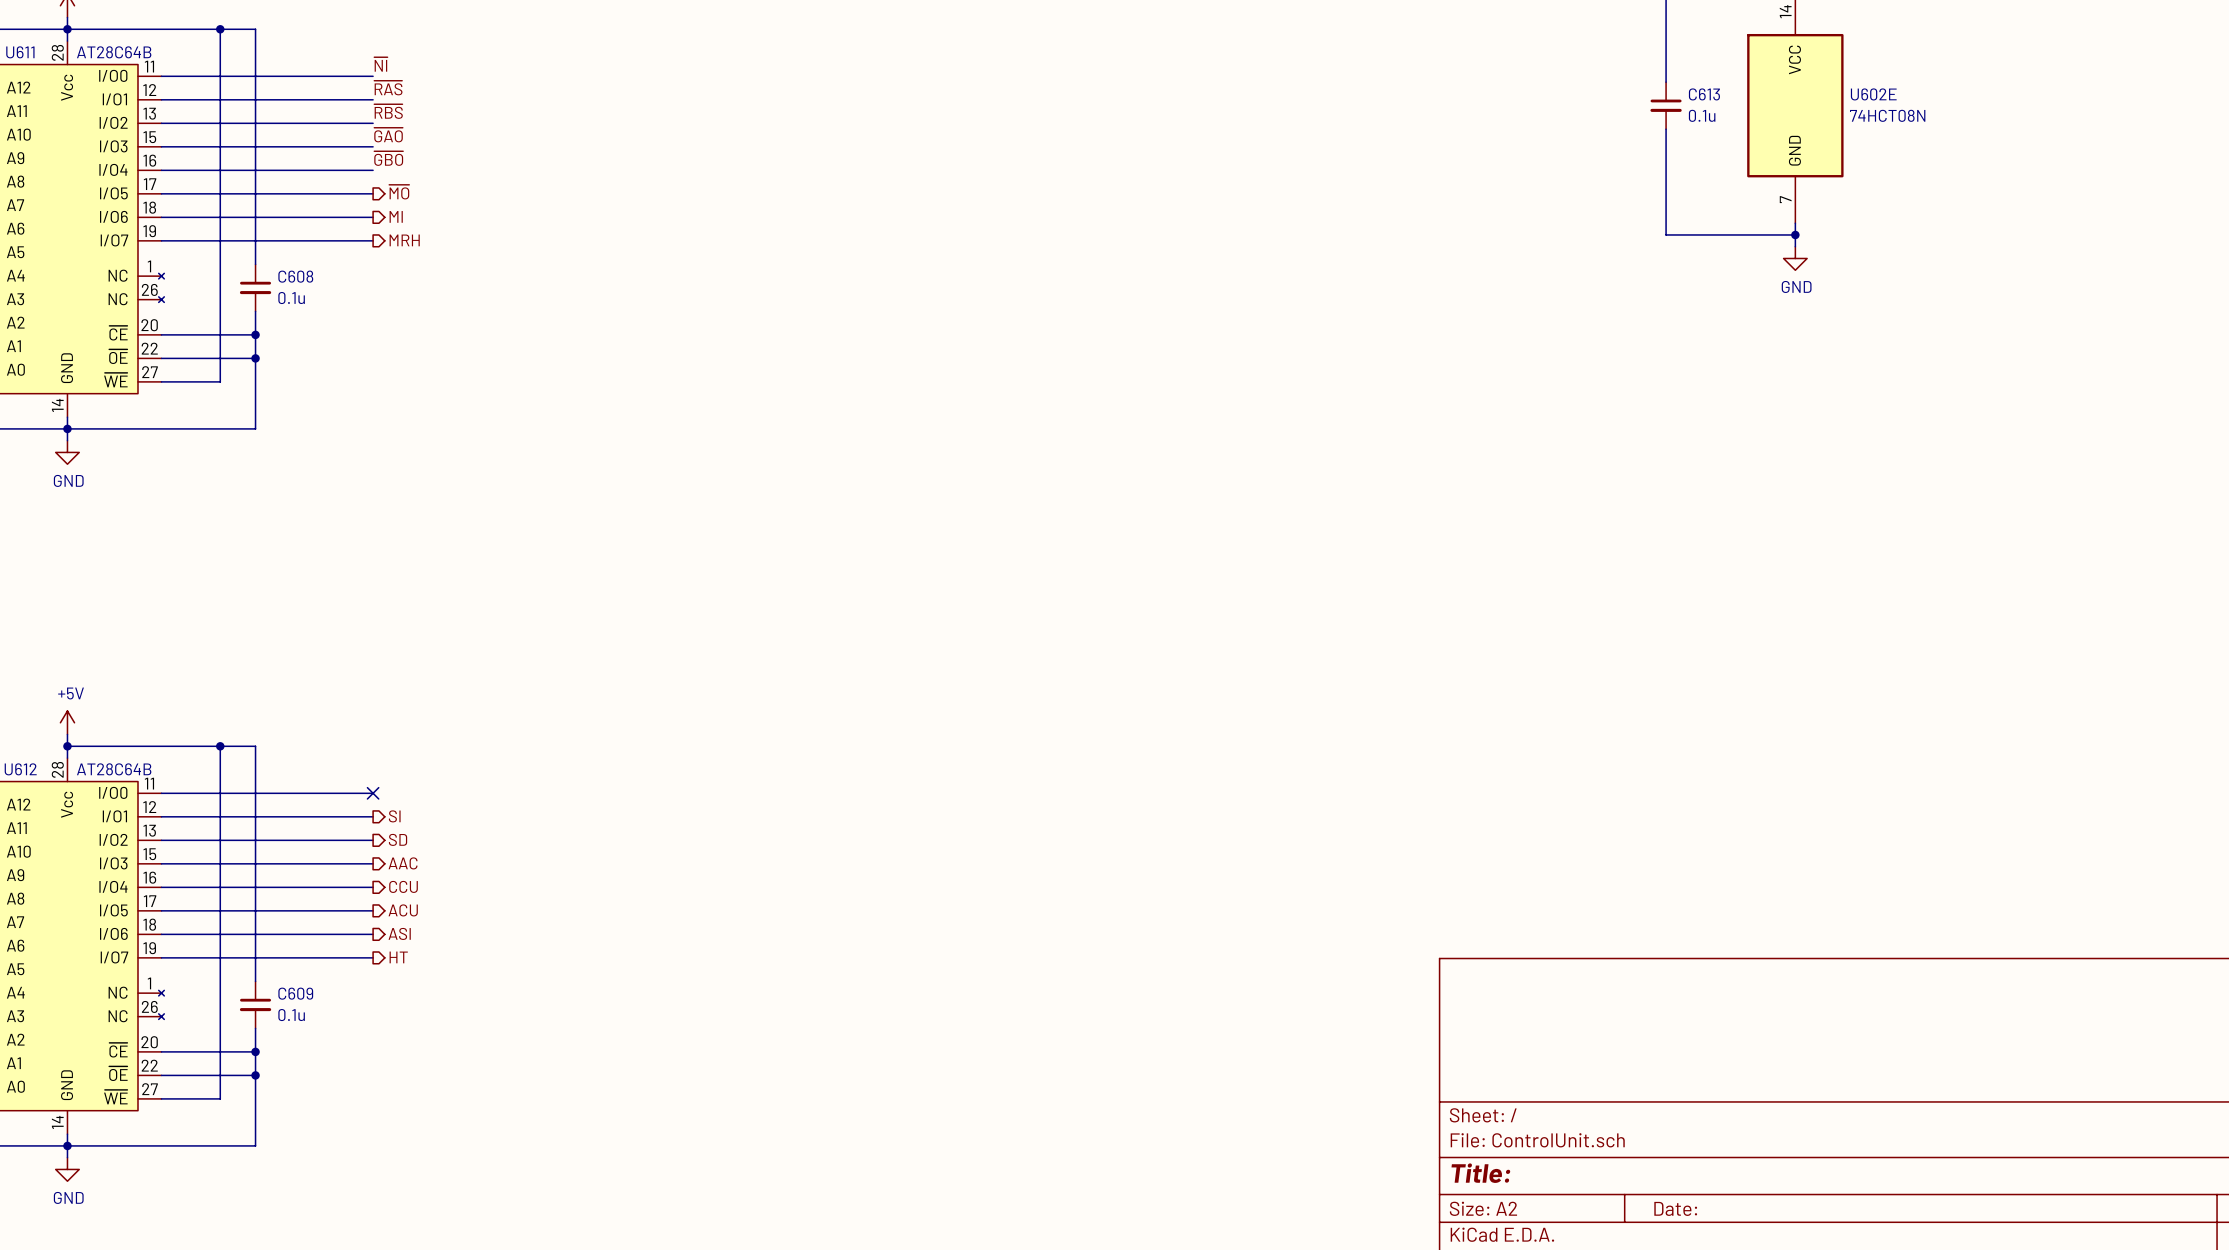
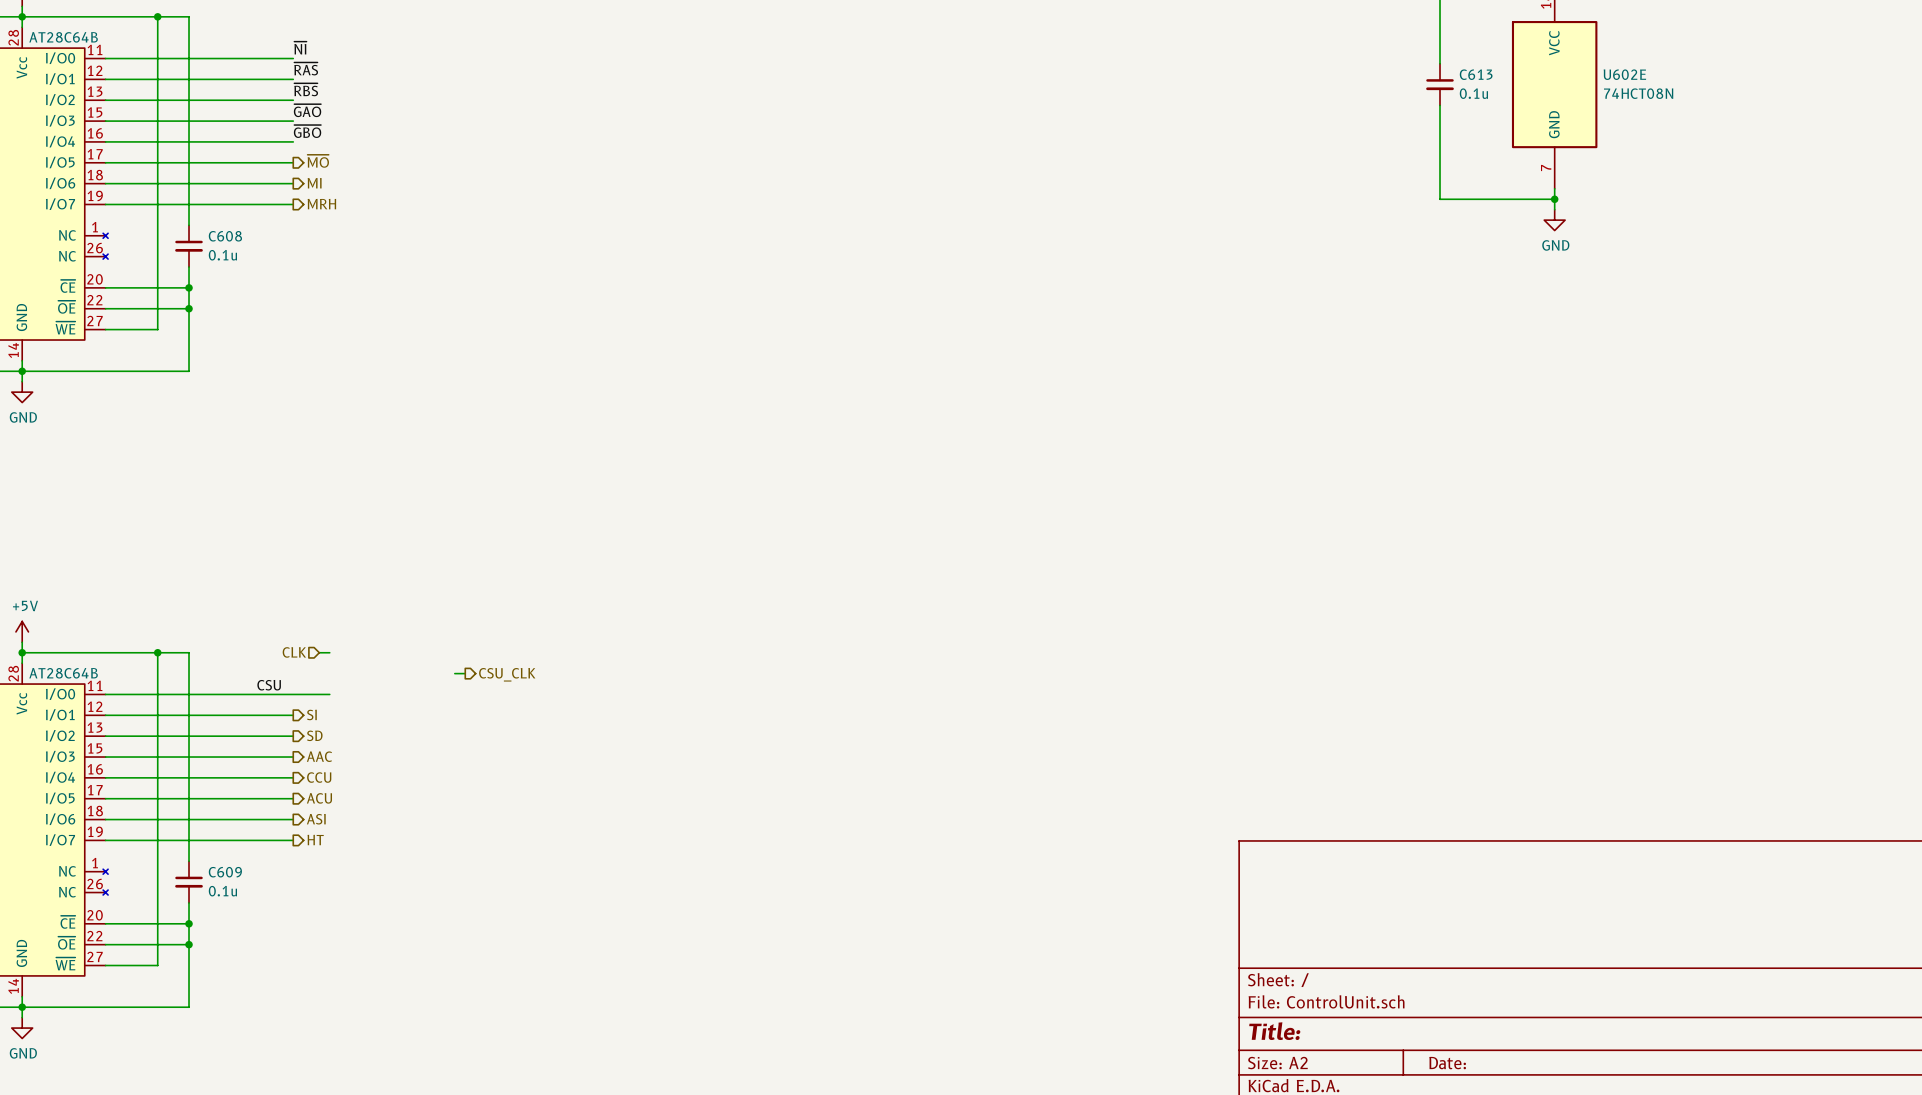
hierarchical label: none -> CLK (294, 652)
wire: none -> (319, 652) (329, 652)
wire: none -> (454, 673) (465, 673)
hierarchical label: none -> CSU_CLK (507, 674)
label: none -> CSU (269, 685)
wire: none -> (293, 694) (329, 694)
no-connect mark: (373, 793) -> none

